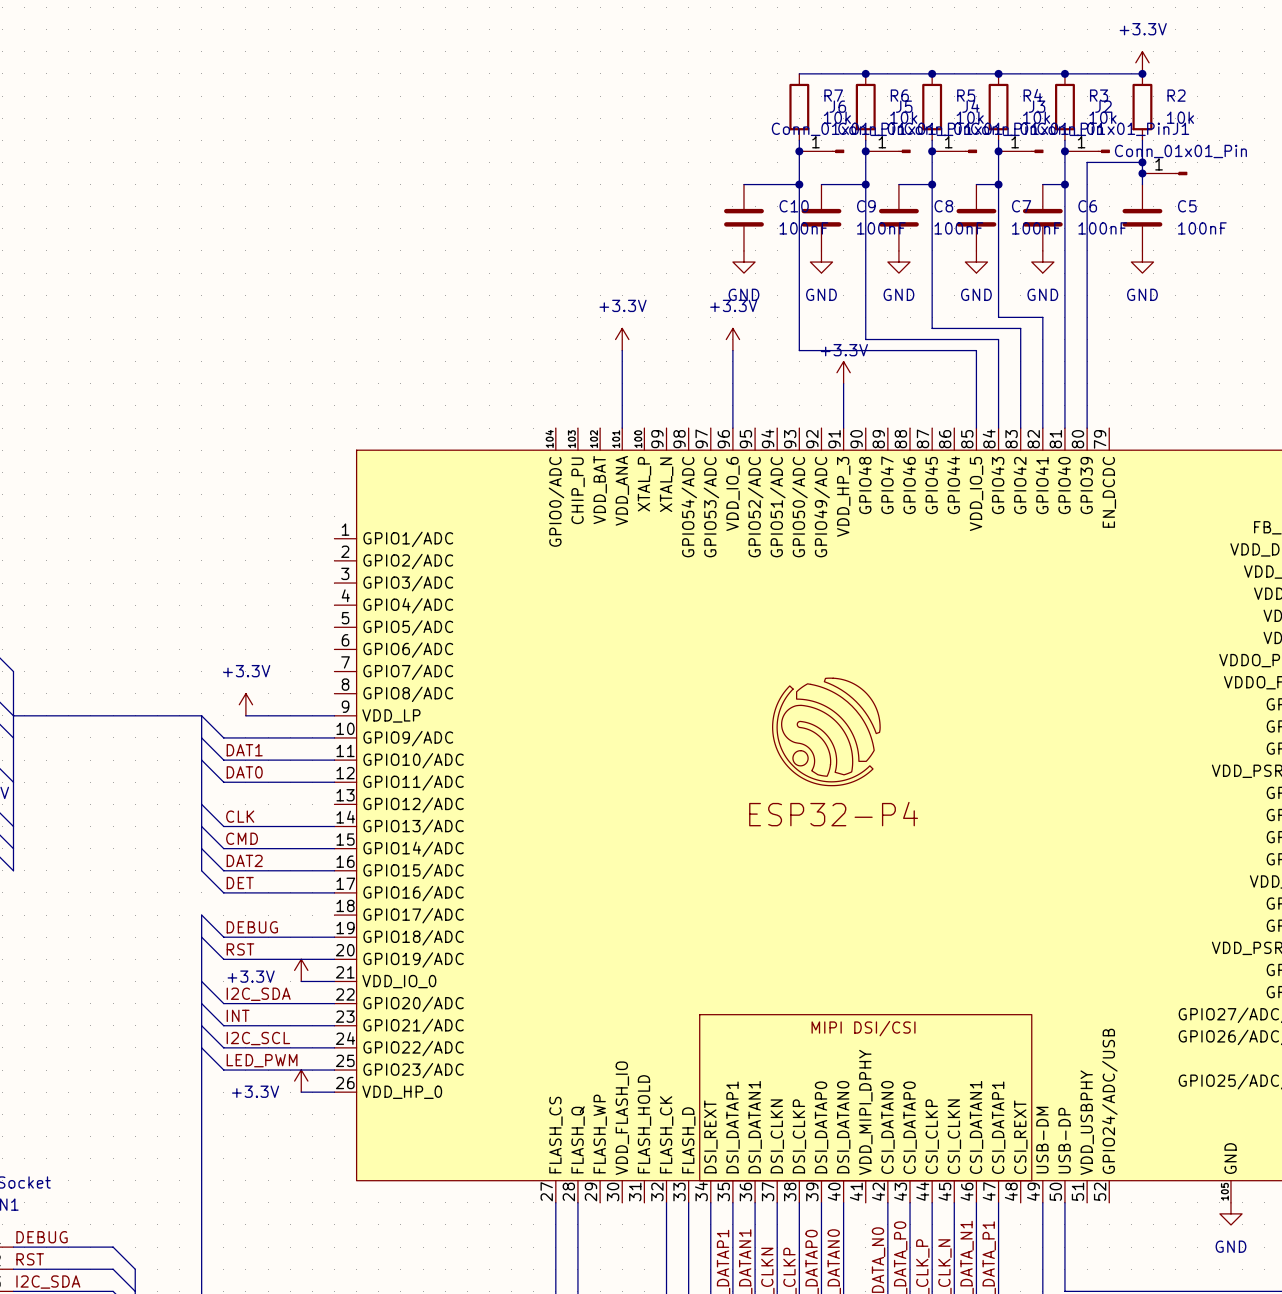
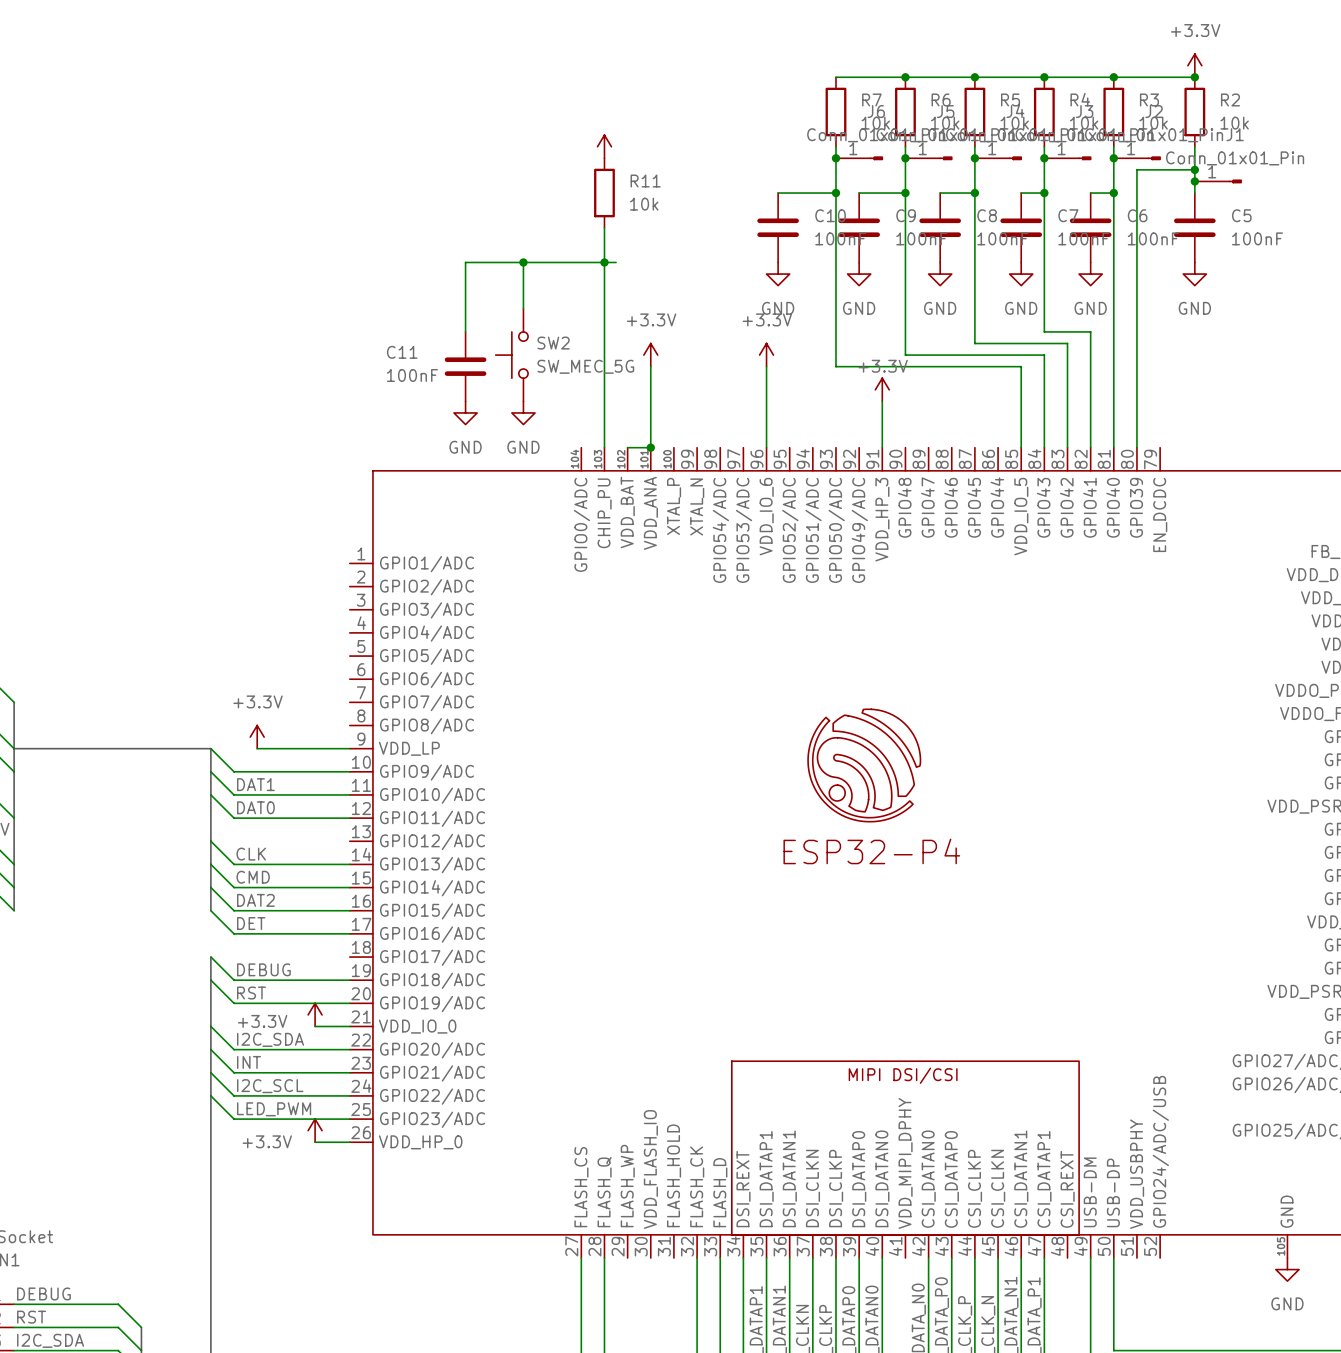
power symbol: none -> (604, 146)
R11: none -> 10k (604, 193)
wire: none -> (604, 227) (604, 447)
wire: none -> (523, 262) (523, 308)
junction: none -> (523, 262)
junction: none -> (604, 262)
wire: none -> (616, 262) (465, 262) (465, 331)
SW2: none -> SW_MEC_5G (511, 355)
C11: none -> 100nF (465, 366)
power symbol: none -> GND (465, 412)
power symbol: none -> GND (523, 412)
wire: none -> (627, 447) (650, 447)
junction: none -> (650, 447)

